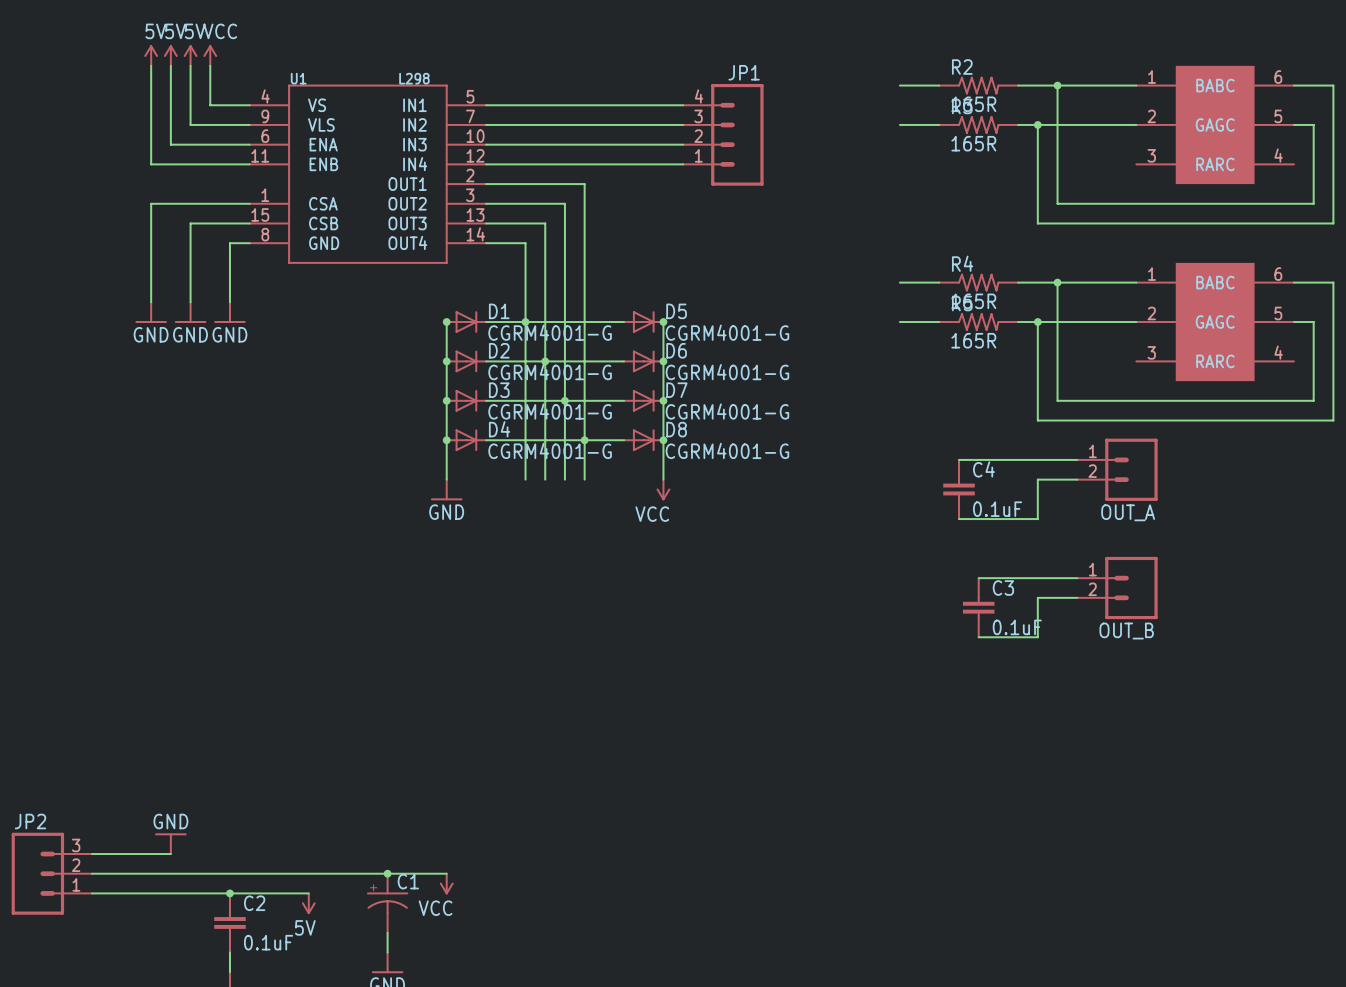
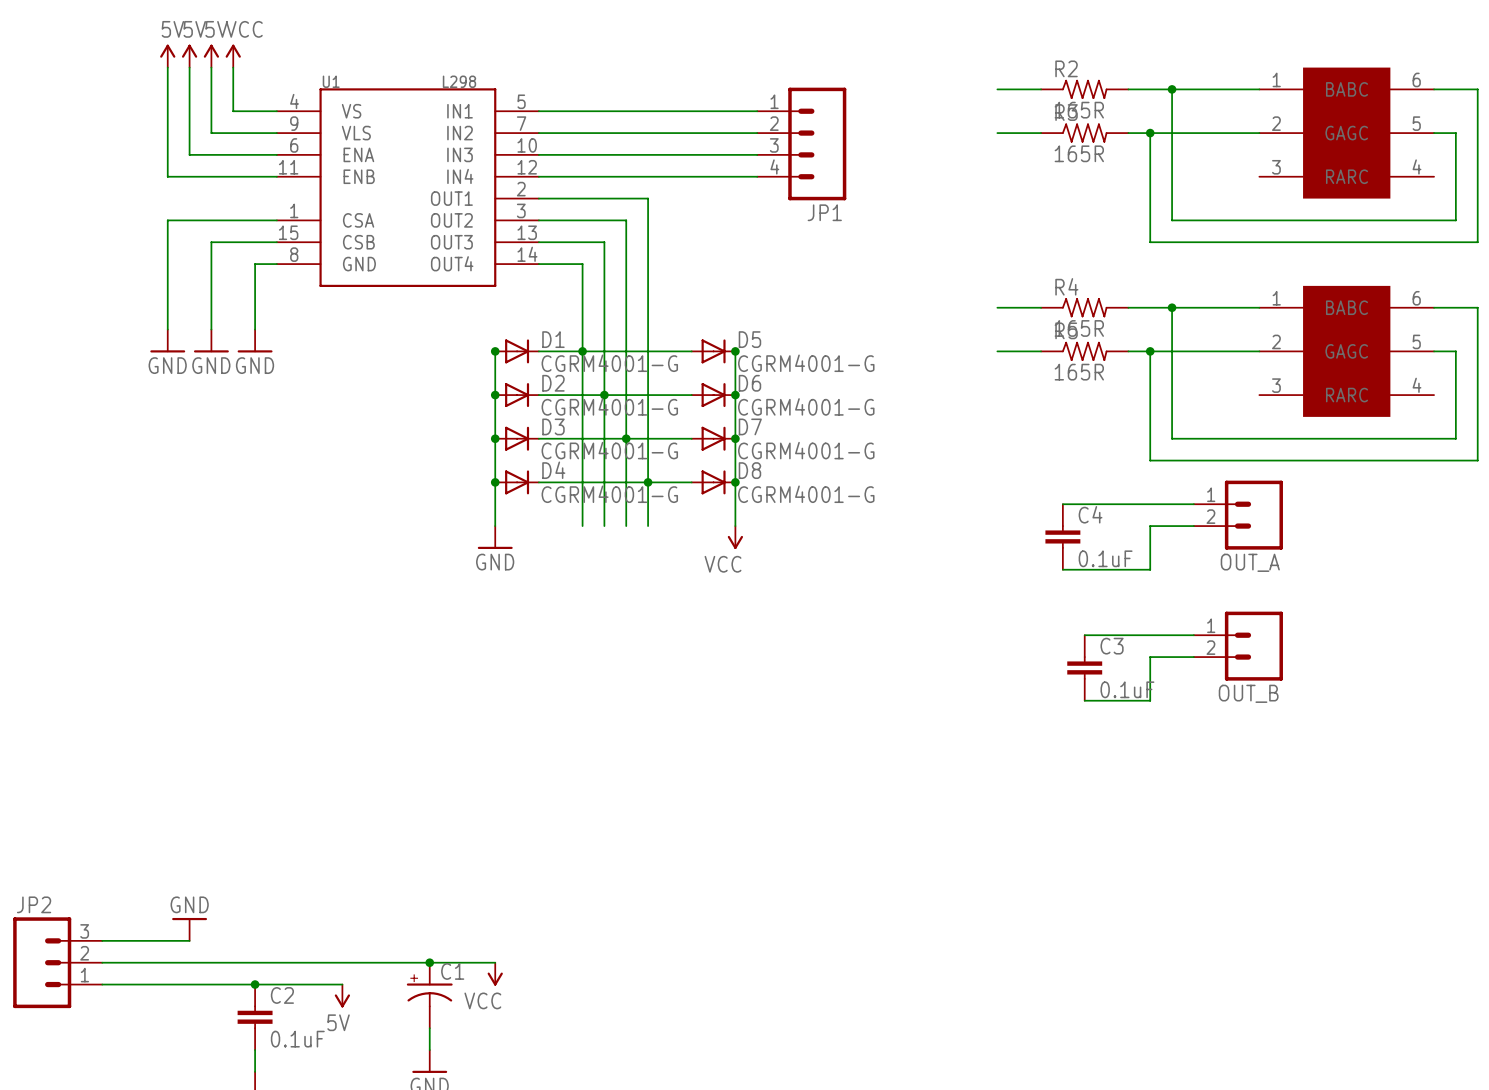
JP1 flip: as is (737, 134) -> up-down (817, 143)

